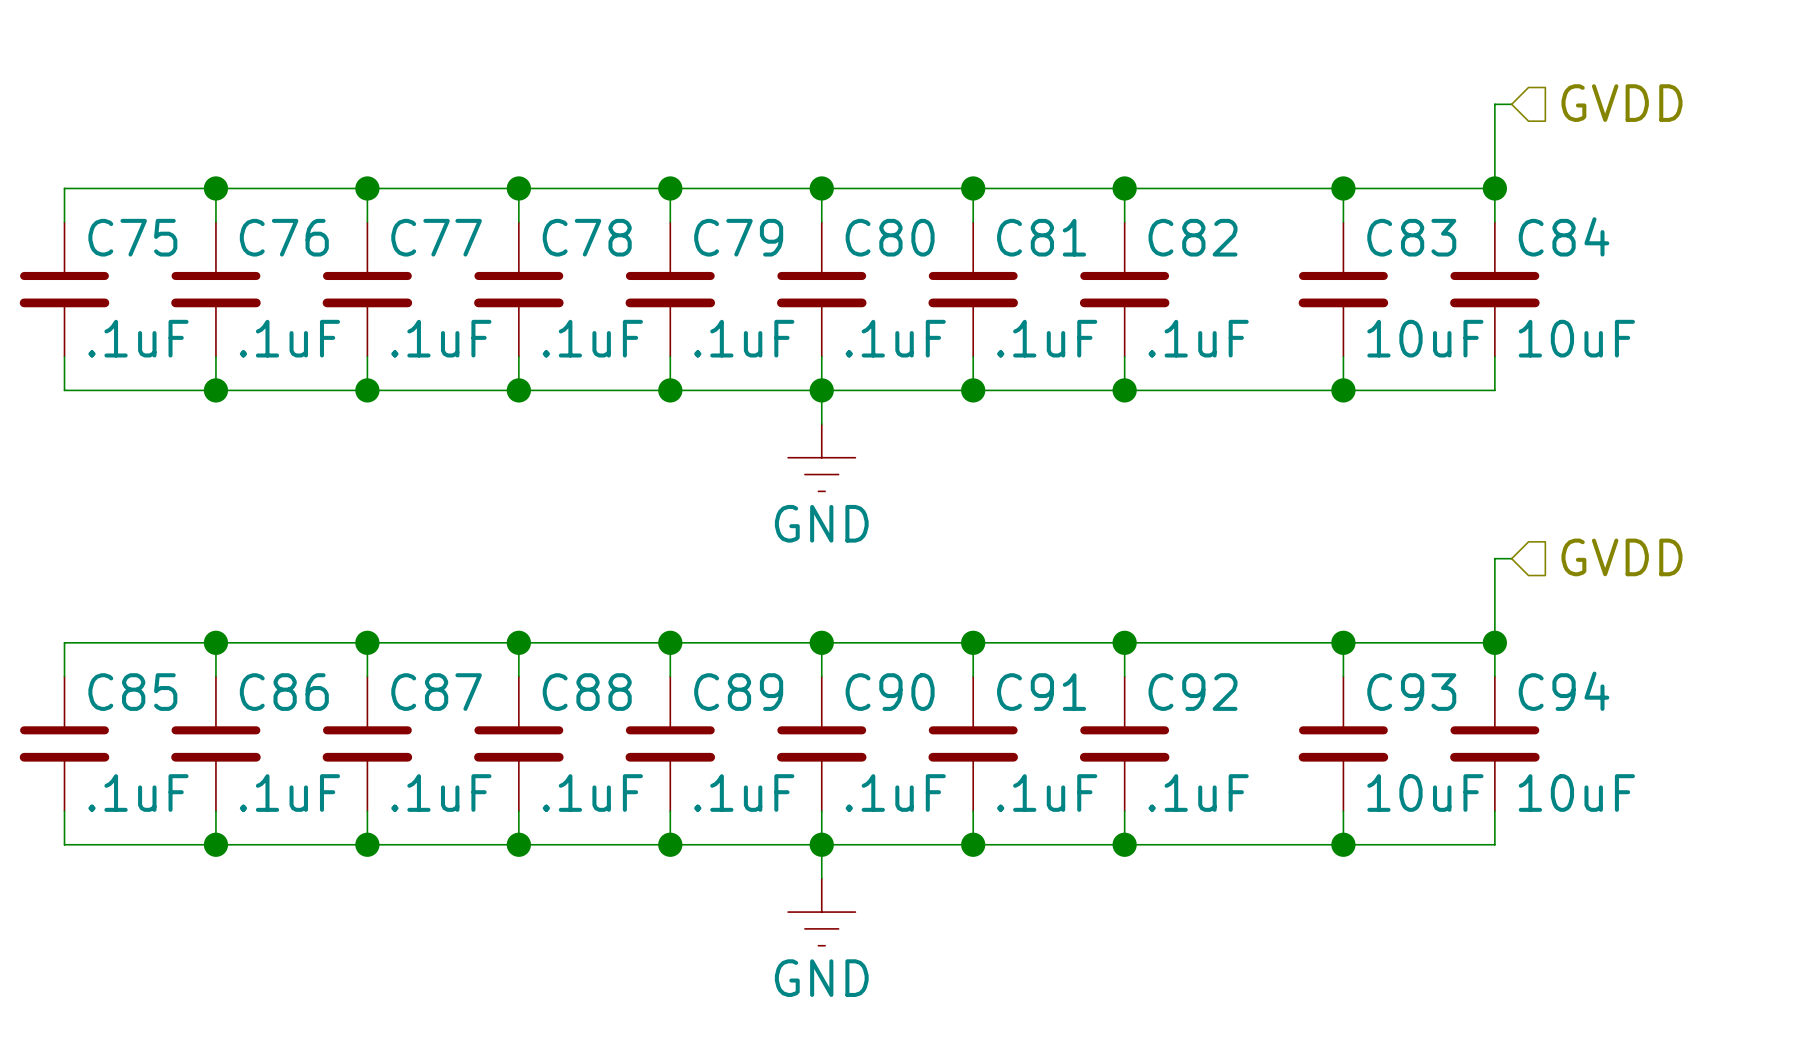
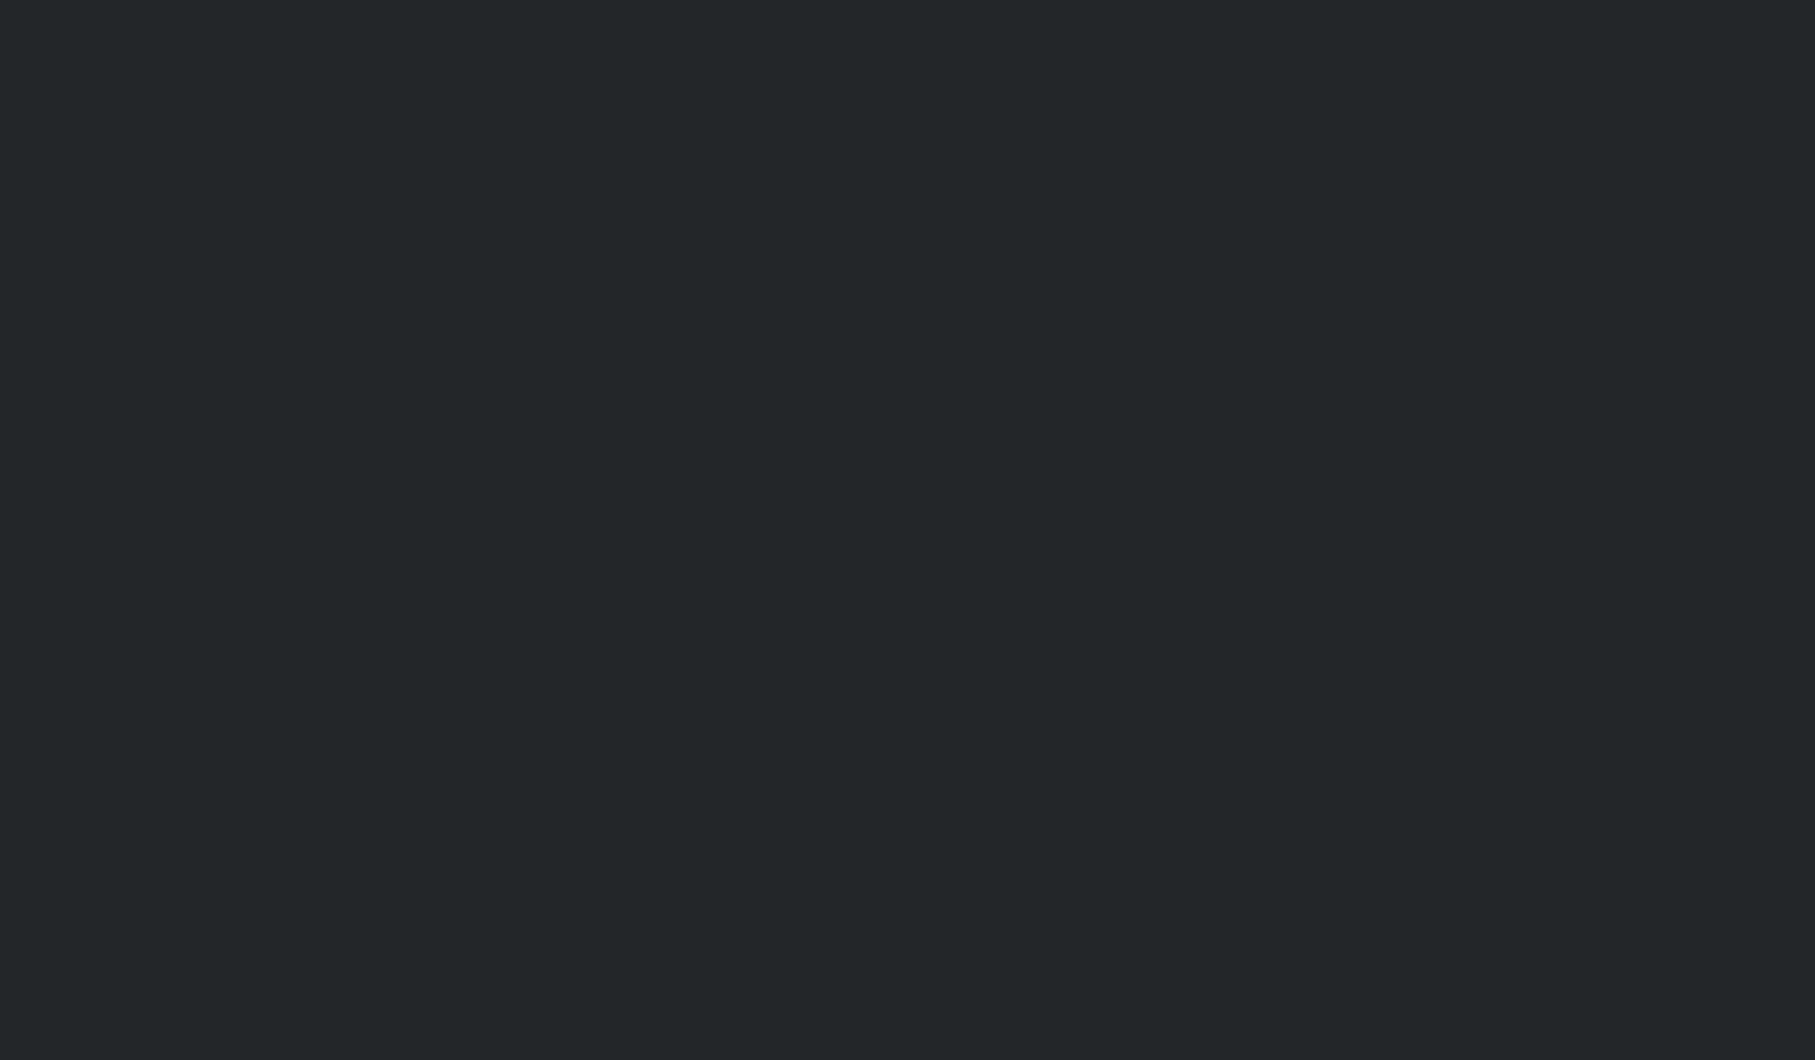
hierarchical label: GVDD (1622, 103) -> none
wire: (1511, 104) (1494, 104) (1494, 222) -> none
wire: (215, 188) (215, 222) -> none
junction: (215, 188) -> none
wire: (367, 188) (367, 222) -> none
junction: (367, 188) -> none
wire: (518, 188) (518, 222) -> none
junction: (518, 188) -> none
wire: (670, 188) (670, 222) -> none
junction: (670, 188) -> none
wire: (821, 188) (821, 222) -> none
junction: (821, 188) -> none
wire: (973, 188) (973, 222) -> none
junction: (973, 188) -> none
wire: (1124, 188) (1124, 222) -> none
junction: (1124, 188) -> none
wire: (1343, 188) (1343, 222) -> none
junction: (1343, 188) -> none
wire: (1494, 188) (64, 188) (64, 222) -> none
junction: (1494, 188) -> none
C75: .1uF (64, 289) -> none
C76: .1uF (215, 289) -> none
C77: .1uF (367, 289) -> none
C78: .1uF (518, 289) -> none
C79: .1uF (670, 289) -> none
C80: .1uF (821, 289) -> none
C81: .1uF (973, 289) -> none
C82: .1uF (1124, 289) -> none
C83: 10uF (1343, 289) -> none
C84: 10uF (1494, 289) -> none
wire: (64, 356) (64, 390) (1494, 390) (1494, 356) -> none
wire: (215, 356) (215, 390) -> none
wire: (367, 356) (367, 390) -> none
wire: (518, 356) (518, 390) -> none
wire: (670, 356) (670, 390) -> none
wire: (821, 356) (821, 424) -> none
wire: (973, 356) (973, 390) -> none
wire: (1124, 356) (1124, 390) -> none
wire: (1343, 356) (1343, 390) -> none
junction: (215, 390) -> none
junction: (367, 390) -> none
junction: (518, 390) -> none
junction: (670, 390) -> none
junction: (821, 390) -> none
junction: (973, 390) -> none
junction: (1124, 390) -> none
junction: (1343, 390) -> none
power symbol: GND (821, 457) -> none
hierarchical label: GVDD (1622, 557) -> none
wire: (1511, 558) (1494, 558) (1494, 676) -> none
wire: (215, 642) (215, 676) -> none
junction: (215, 642) -> none
wire: (367, 642) (367, 676) -> none
junction: (367, 642) -> none
wire: (518, 642) (518, 676) -> none
junction: (518, 642) -> none
wire: (670, 642) (670, 676) -> none
junction: (670, 642) -> none
wire: (821, 642) (821, 676) -> none
junction: (821, 642) -> none
wire: (973, 642) (973, 676) -> none
junction: (973, 642) -> none
wire: (1124, 642) (1124, 676) -> none
junction: (1124, 642) -> none
wire: (1343, 642) (1343, 676) -> none
junction: (1343, 642) -> none
wire: (1494, 642) (64, 642) (64, 676) -> none
junction: (1494, 642) -> none
C85: .1uF (64, 743) -> none
C86: .1uF (215, 743) -> none
C87: .1uF (367, 743) -> none
C88: .1uF (518, 743) -> none
C89: .1uF (670, 743) -> none
C90: .1uF (821, 743) -> none
C91: .1uF (973, 743) -> none
C92: .1uF (1124, 743) -> none
C93: 10uF (1343, 743) -> none
C94: 10uF (1494, 743) -> none
wire: (64, 811) (64, 844) (1494, 844) (1494, 811) -> none
wire: (215, 811) (215, 844) -> none
wire: (367, 811) (367, 844) -> none
wire: (518, 811) (518, 844) -> none
wire: (670, 811) (670, 844) -> none
wire: (821, 811) (821, 878) -> none
wire: (973, 811) (973, 844) -> none
wire: (1124, 811) (1124, 844) -> none
wire: (1343, 811) (1343, 844) -> none
junction: (215, 844) -> none
junction: (367, 844) -> none
junction: (518, 844) -> none
junction: (670, 844) -> none
junction: (821, 844) -> none
junction: (973, 844) -> none
junction: (1124, 844) -> none
junction: (1343, 844) -> none
power symbol: GND (821, 912) -> none

